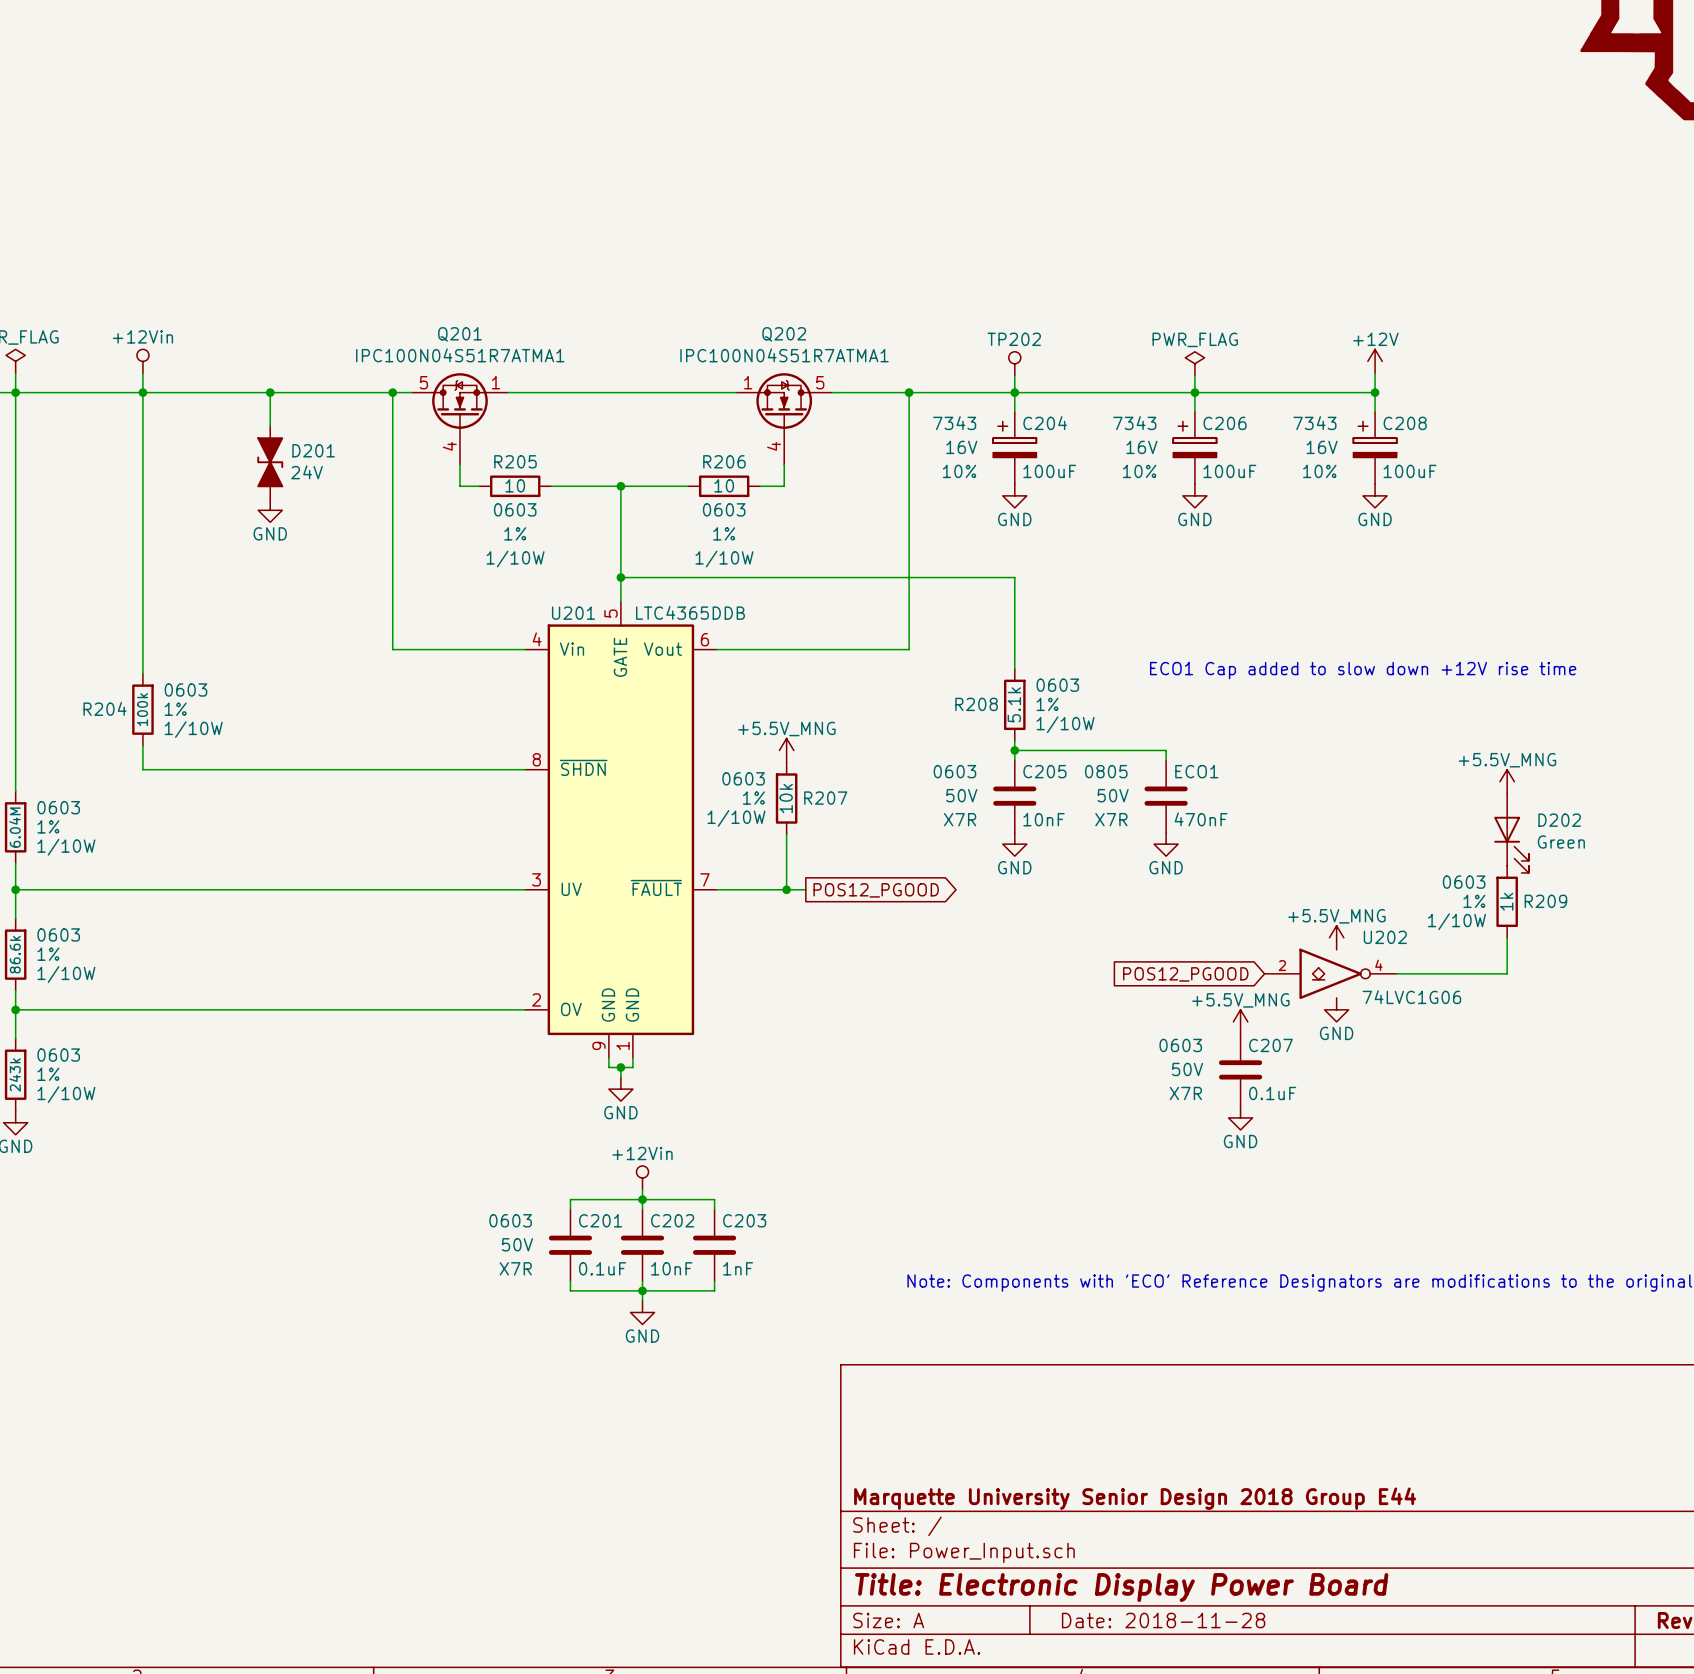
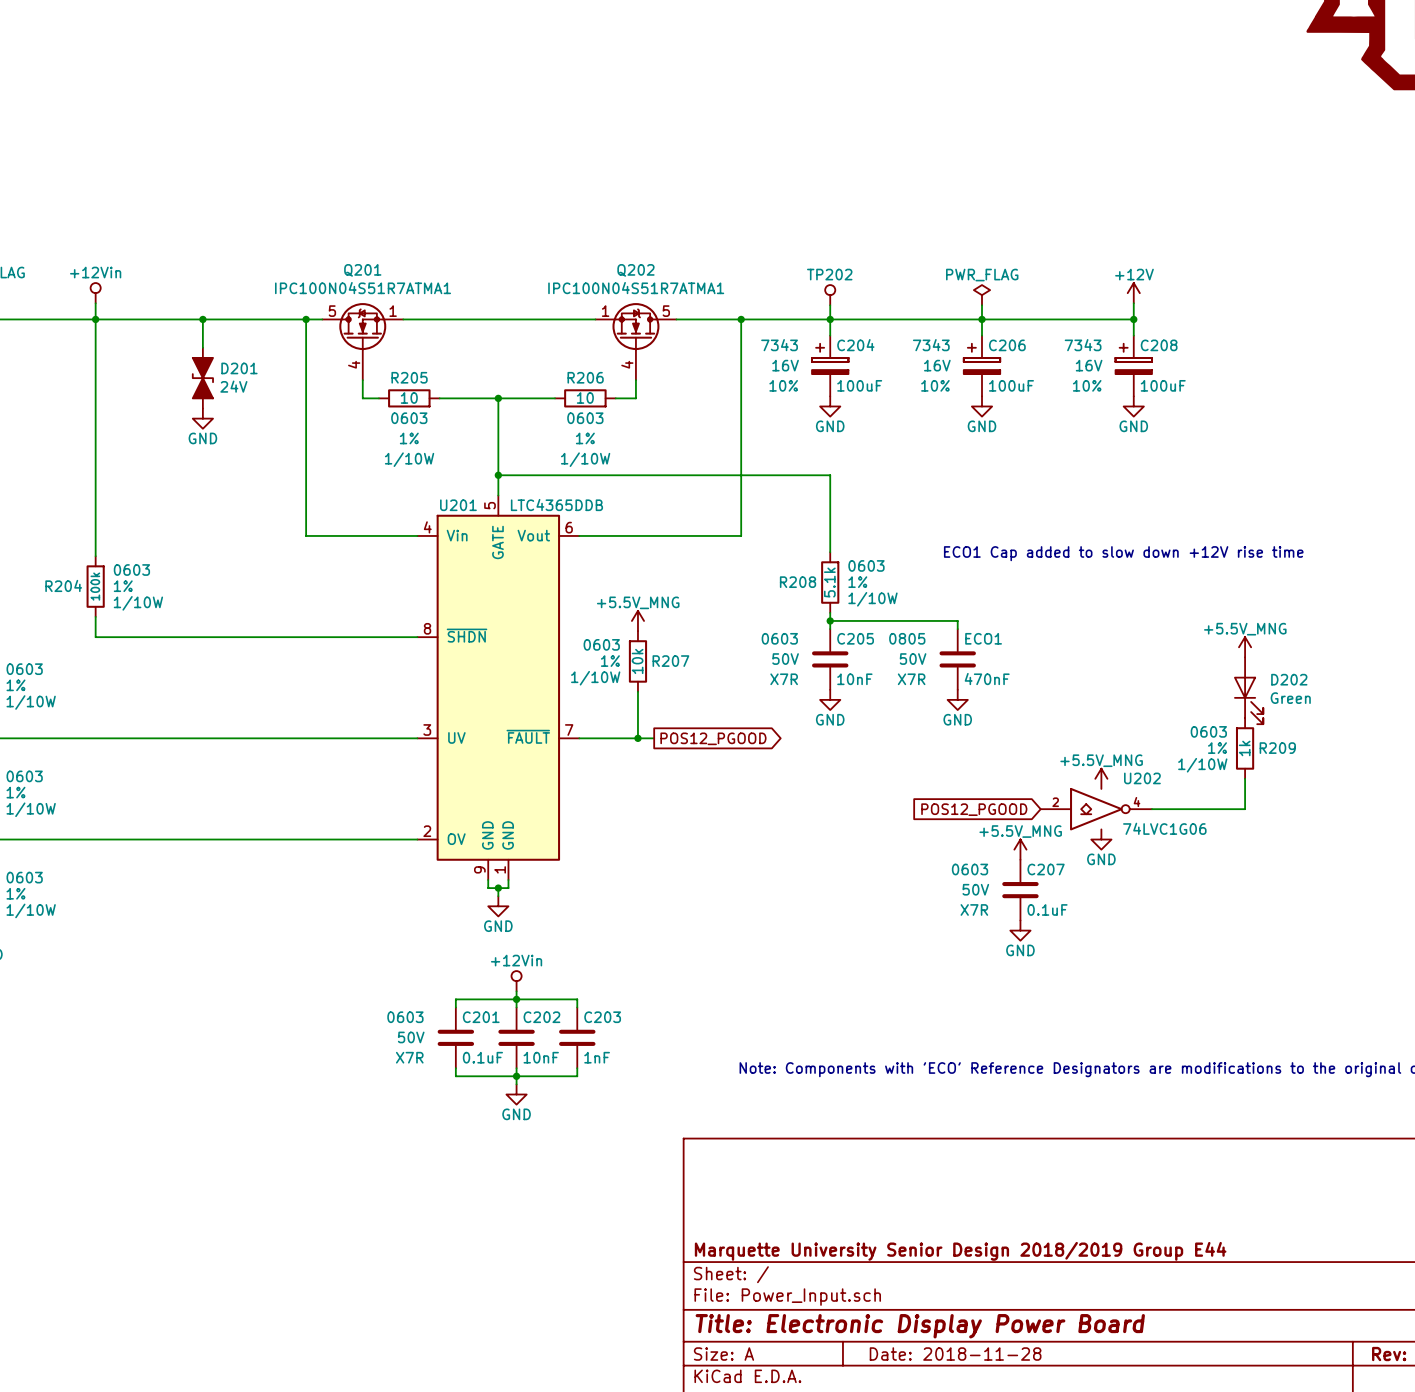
title block: Marquette University Senior Design 2018 Group E44 (1135, 1498) -> Marquette University Senior Design 2018/2019 Group E44 (960, 1251)

